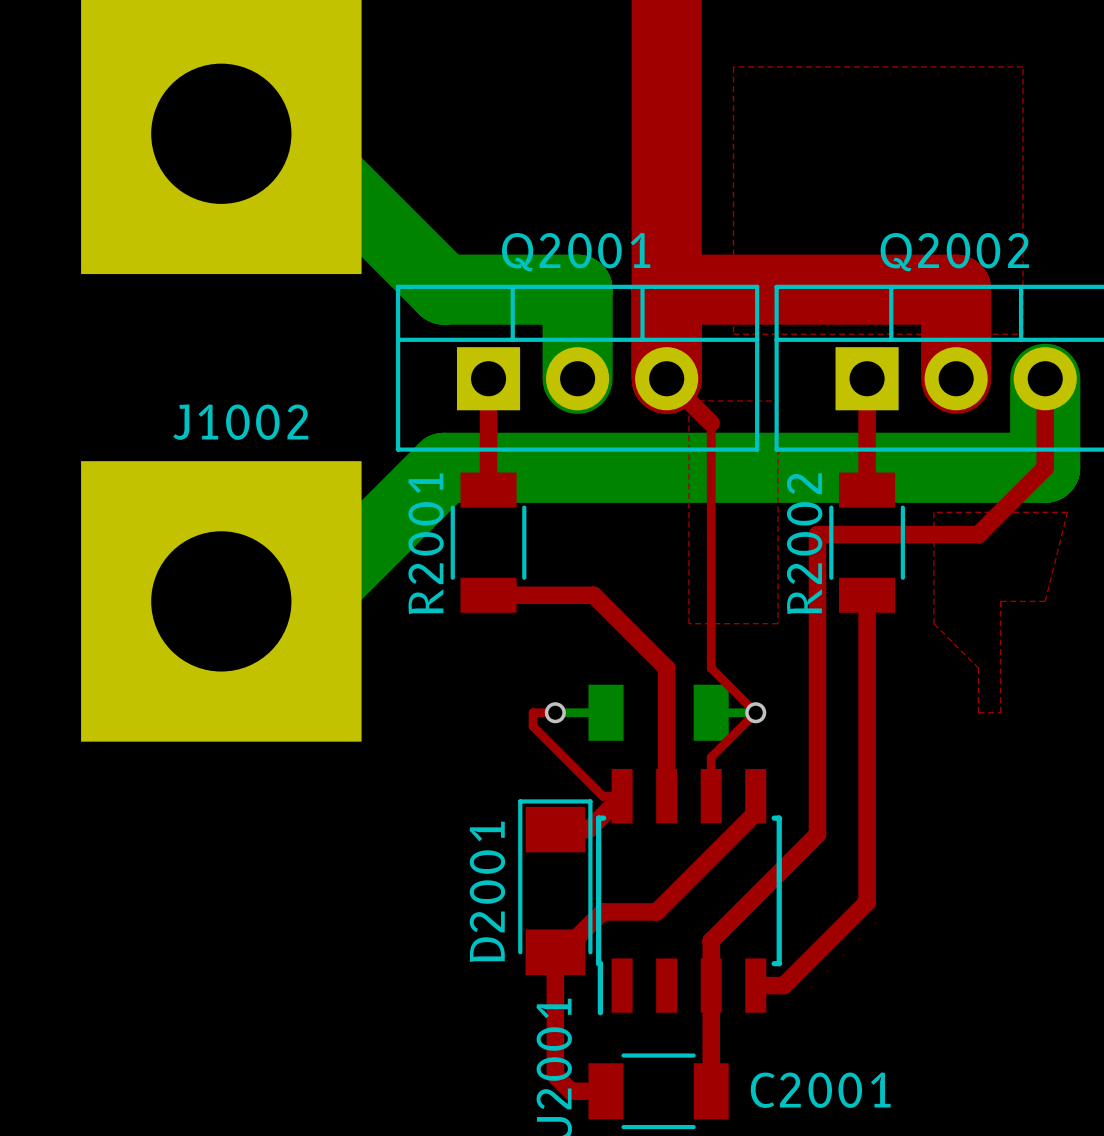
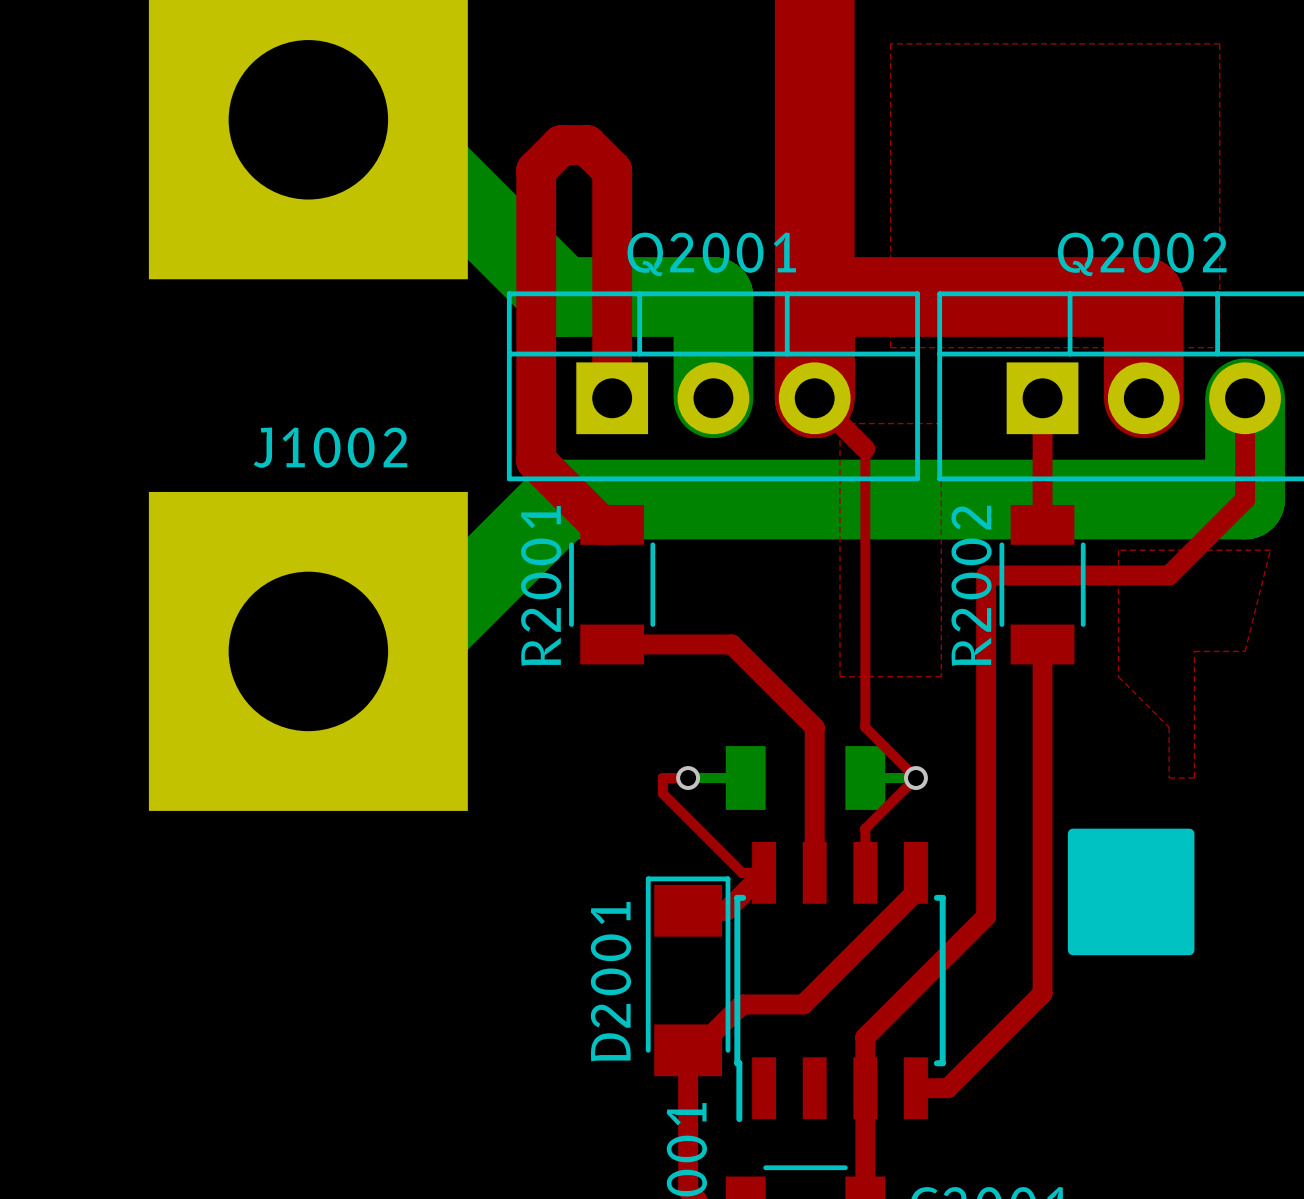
top track: (488, 378) (488, 490) -> (612, 398) (612, 170) (586, 145) (561, 145) (536, 170) (536, 460) (600, 524) (612, 524)
drawing: none -> [1067, 828, 1195, 956]

